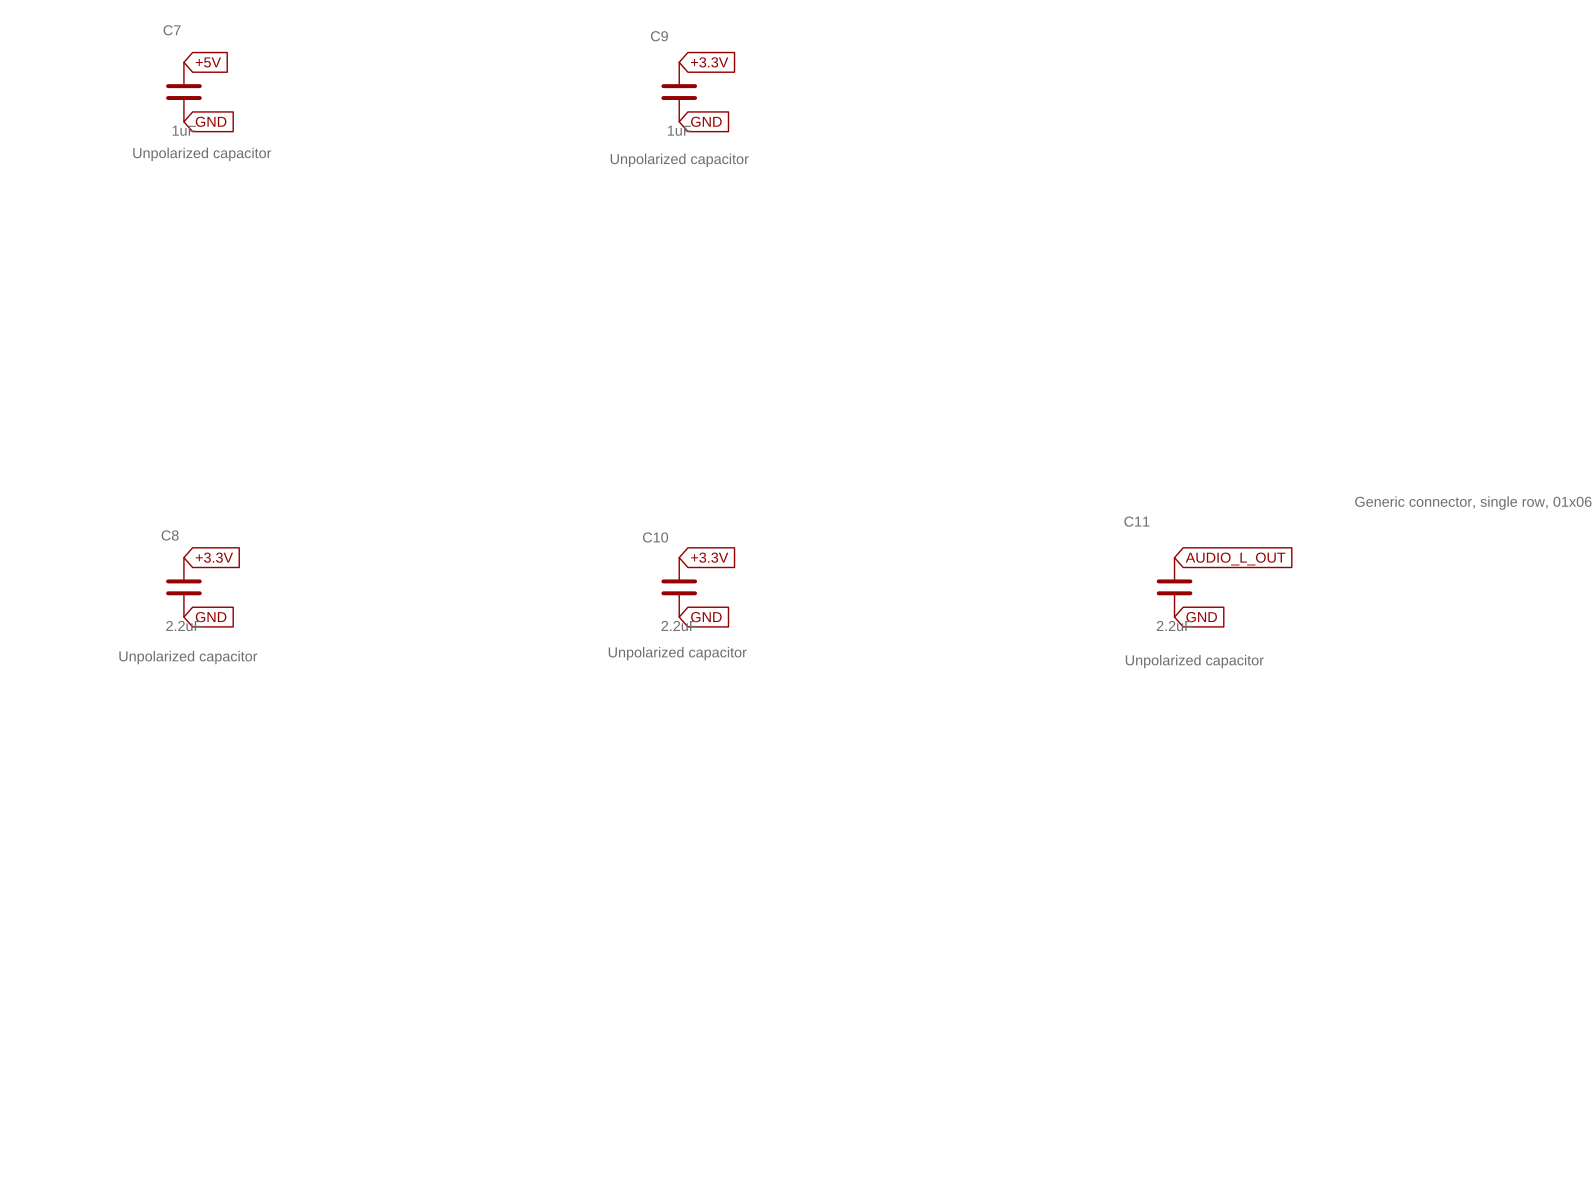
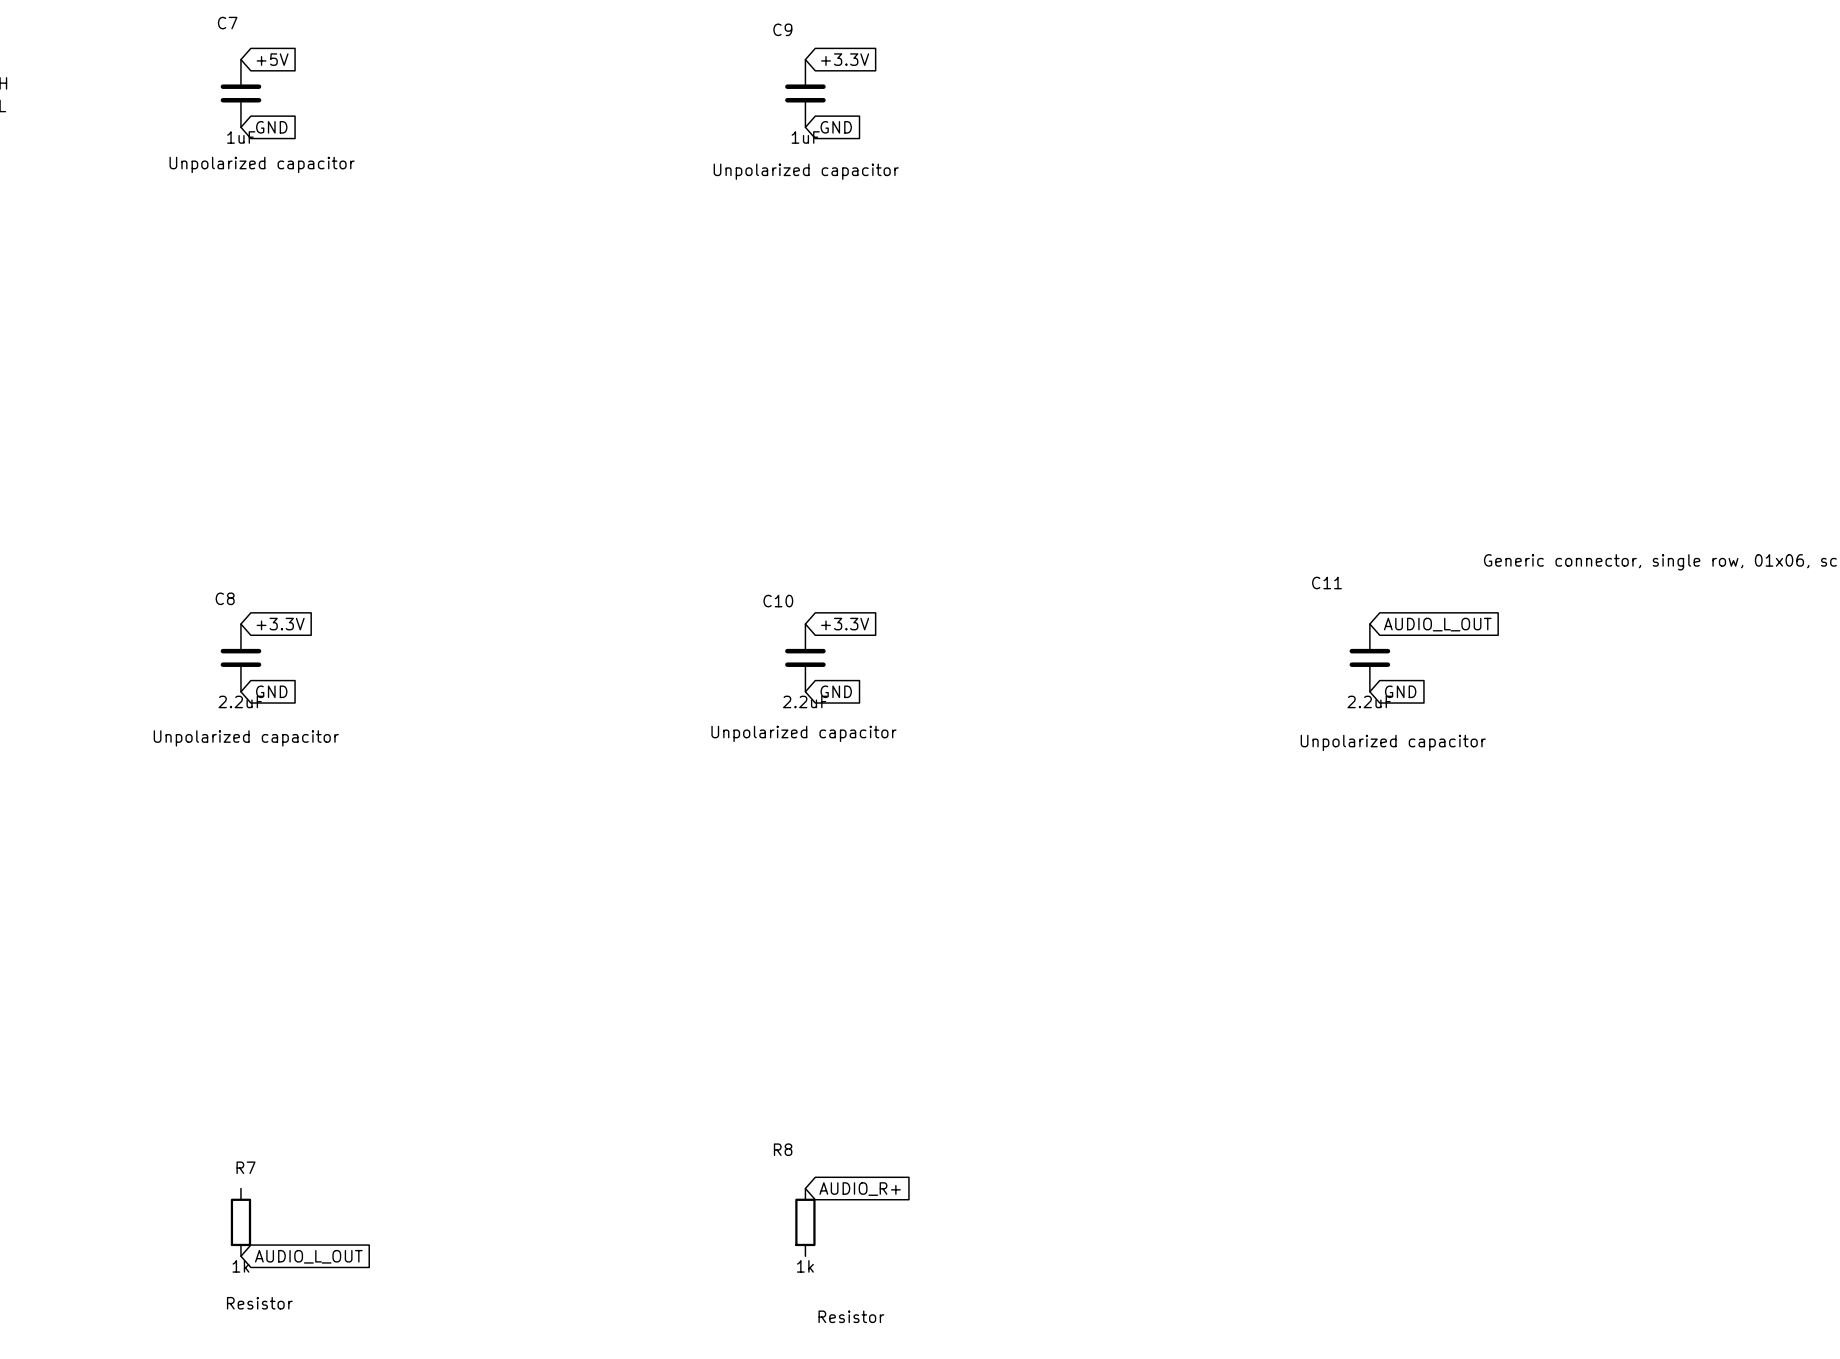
global label: none -> AUDIO_R+ (860, 1189)
R7: none -> 1k (240, 1222)
R8: none -> 1k (805, 1222)
global label: none -> AUDIO_L_OUT (308, 1256)

